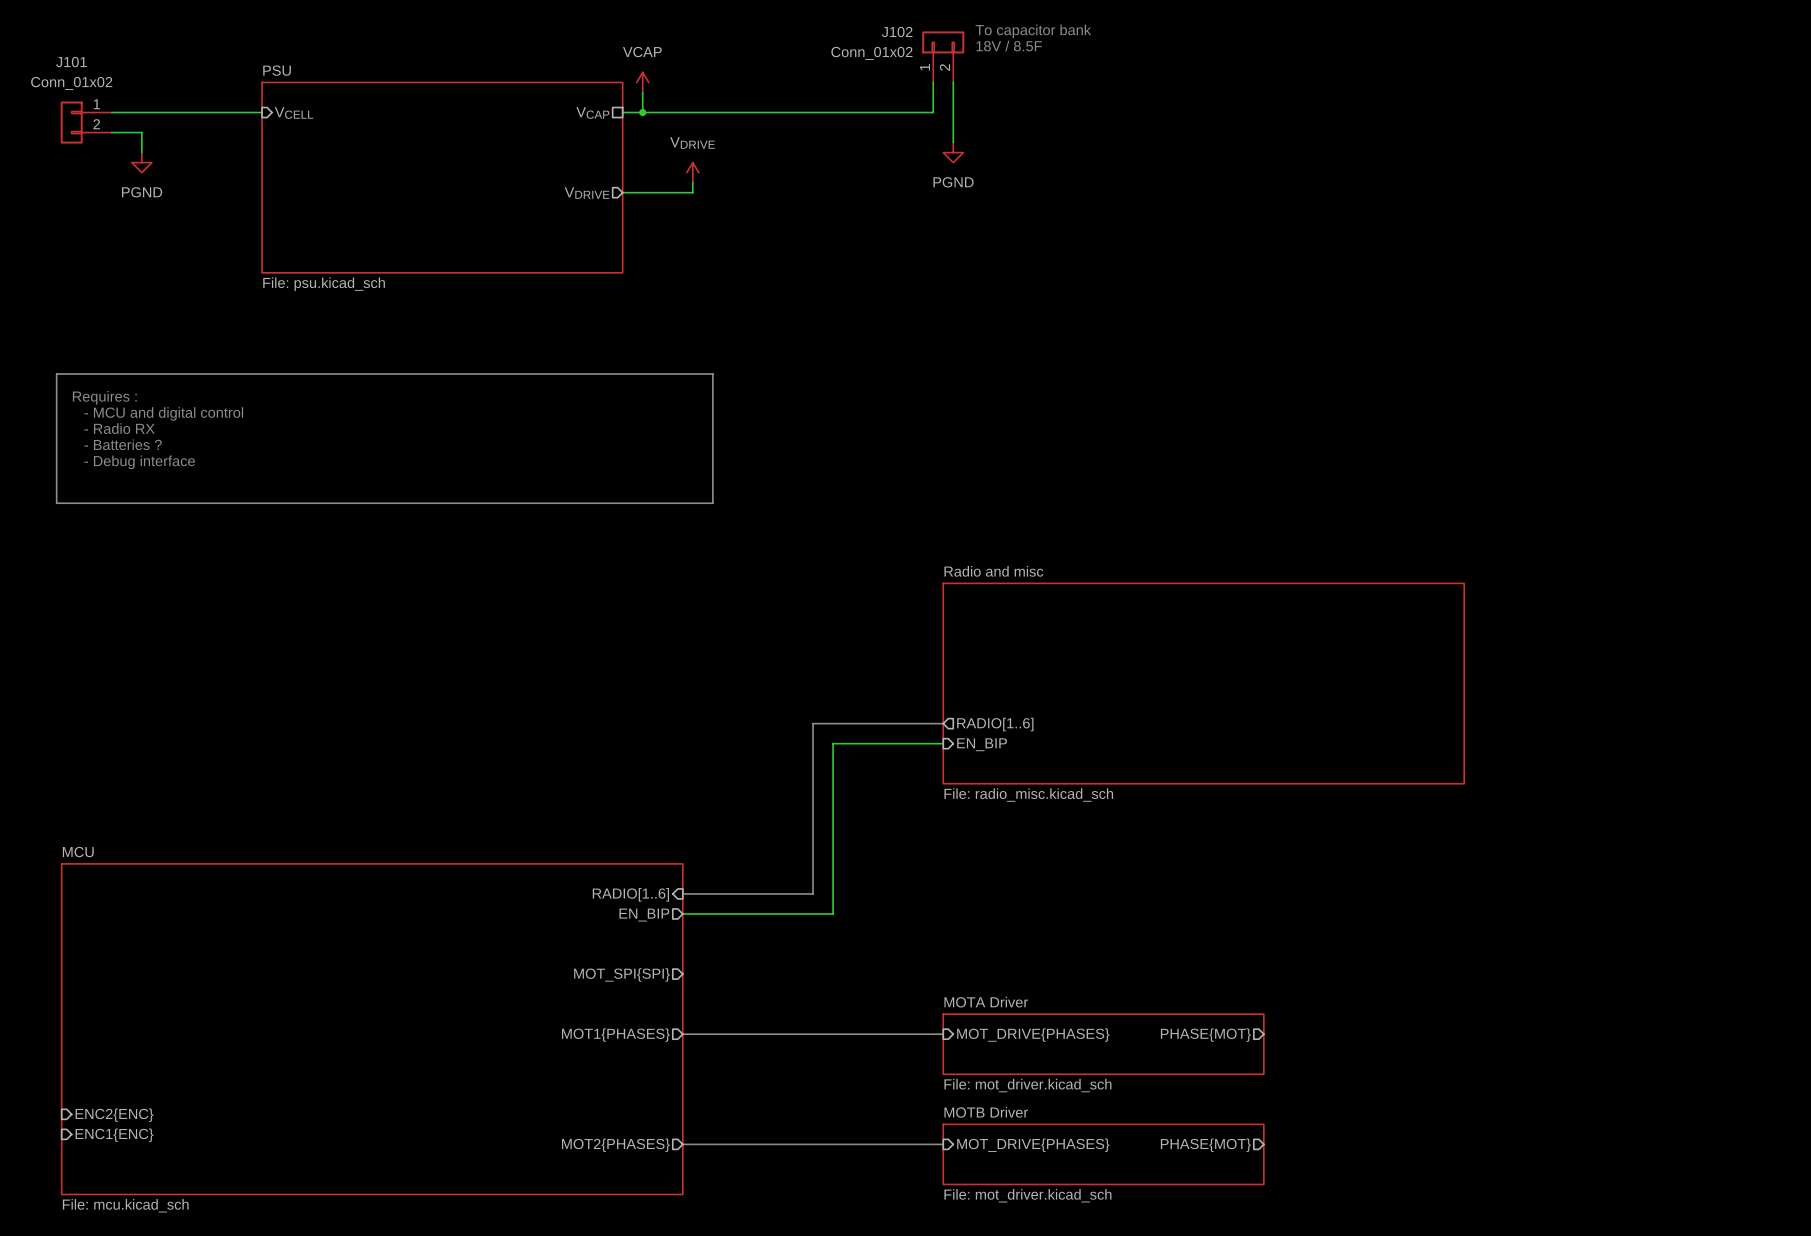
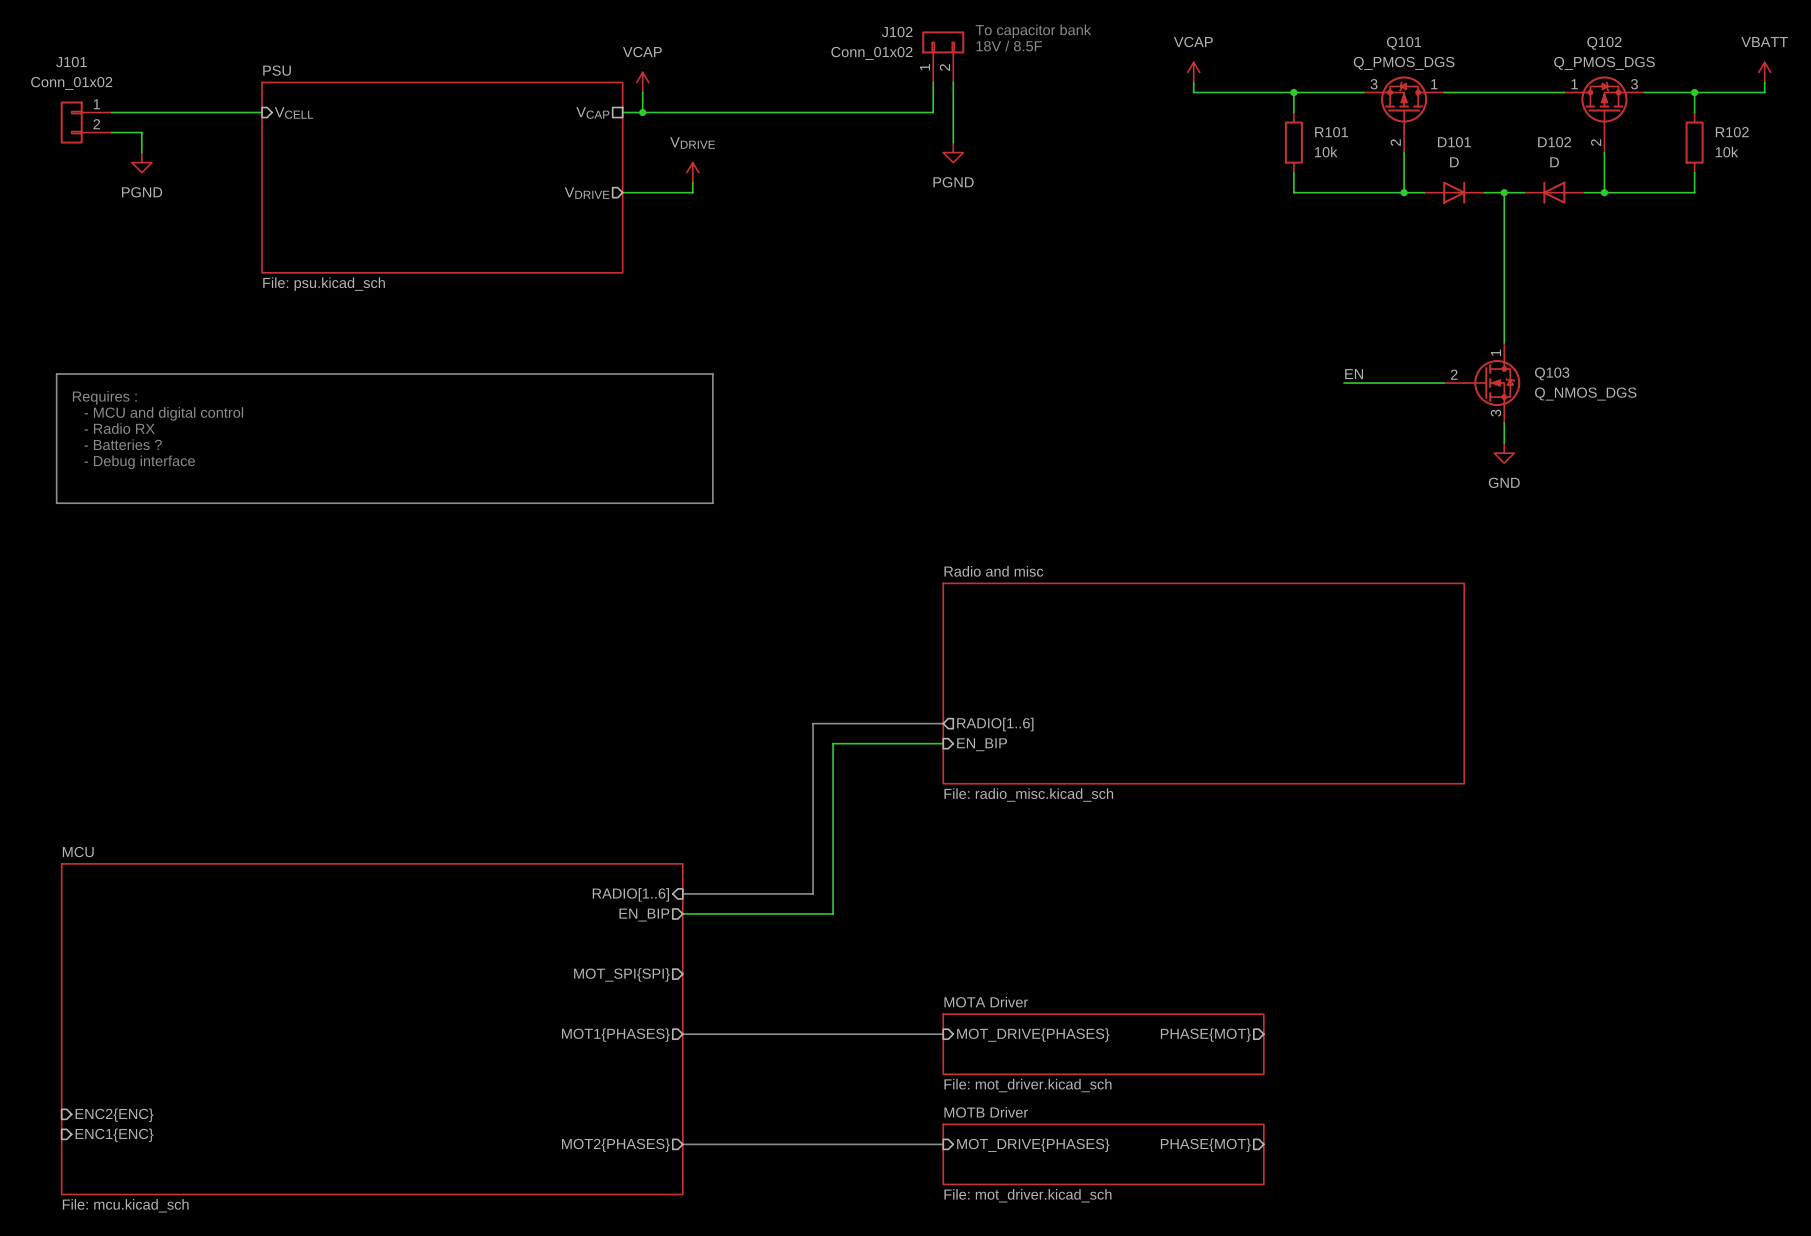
power symbol: none -> VCAP (1193, 72)
power symbol: none -> VBATT (1764, 72)
wire: none -> (1193, 82) (1193, 92) (1364, 92)
wire: none -> (1764, 82) (1764, 92) (1644, 92)
wire: none -> (1293, 92) (1293, 112)
junction: none -> (1293, 92)
wire: none -> (1444, 92) (1564, 92)
wire: none -> (1694, 92) (1694, 112)
junction: none -> (1694, 92)
Q101: none -> Q_PMOS_DGS (1404, 114)
Q102: none -> Q_PMOS_DGS (1604, 114)
R101: none -> 10k (1293, 142)
R102: none -> 10k (1694, 142)
wire: none -> (1404, 152) (1404, 192)
wire: none -> (1604, 152) (1604, 192)
wire: none -> (1293, 172) (1293, 192) (1424, 192)
wire: none -> (1694, 172) (1694, 192) (1584, 192)
junction: none -> (1404, 192)
D101: none -> D (1454, 192)
wire: none -> (1484, 192) (1524, 192)
wire: none -> (1504, 192) (1504, 342)
junction: none -> (1504, 192)
D102: none -> D (1554, 192)
junction: none -> (1604, 192)
label: none -> EN (1354, 374)
wire: none -> (1343, 383) (1444, 383)
Q103: none -> Q_NMOS_DGS (1482, 383)
wire: none -> (1504, 423) (1504, 443)
power symbol: none -> GND (1504, 453)

